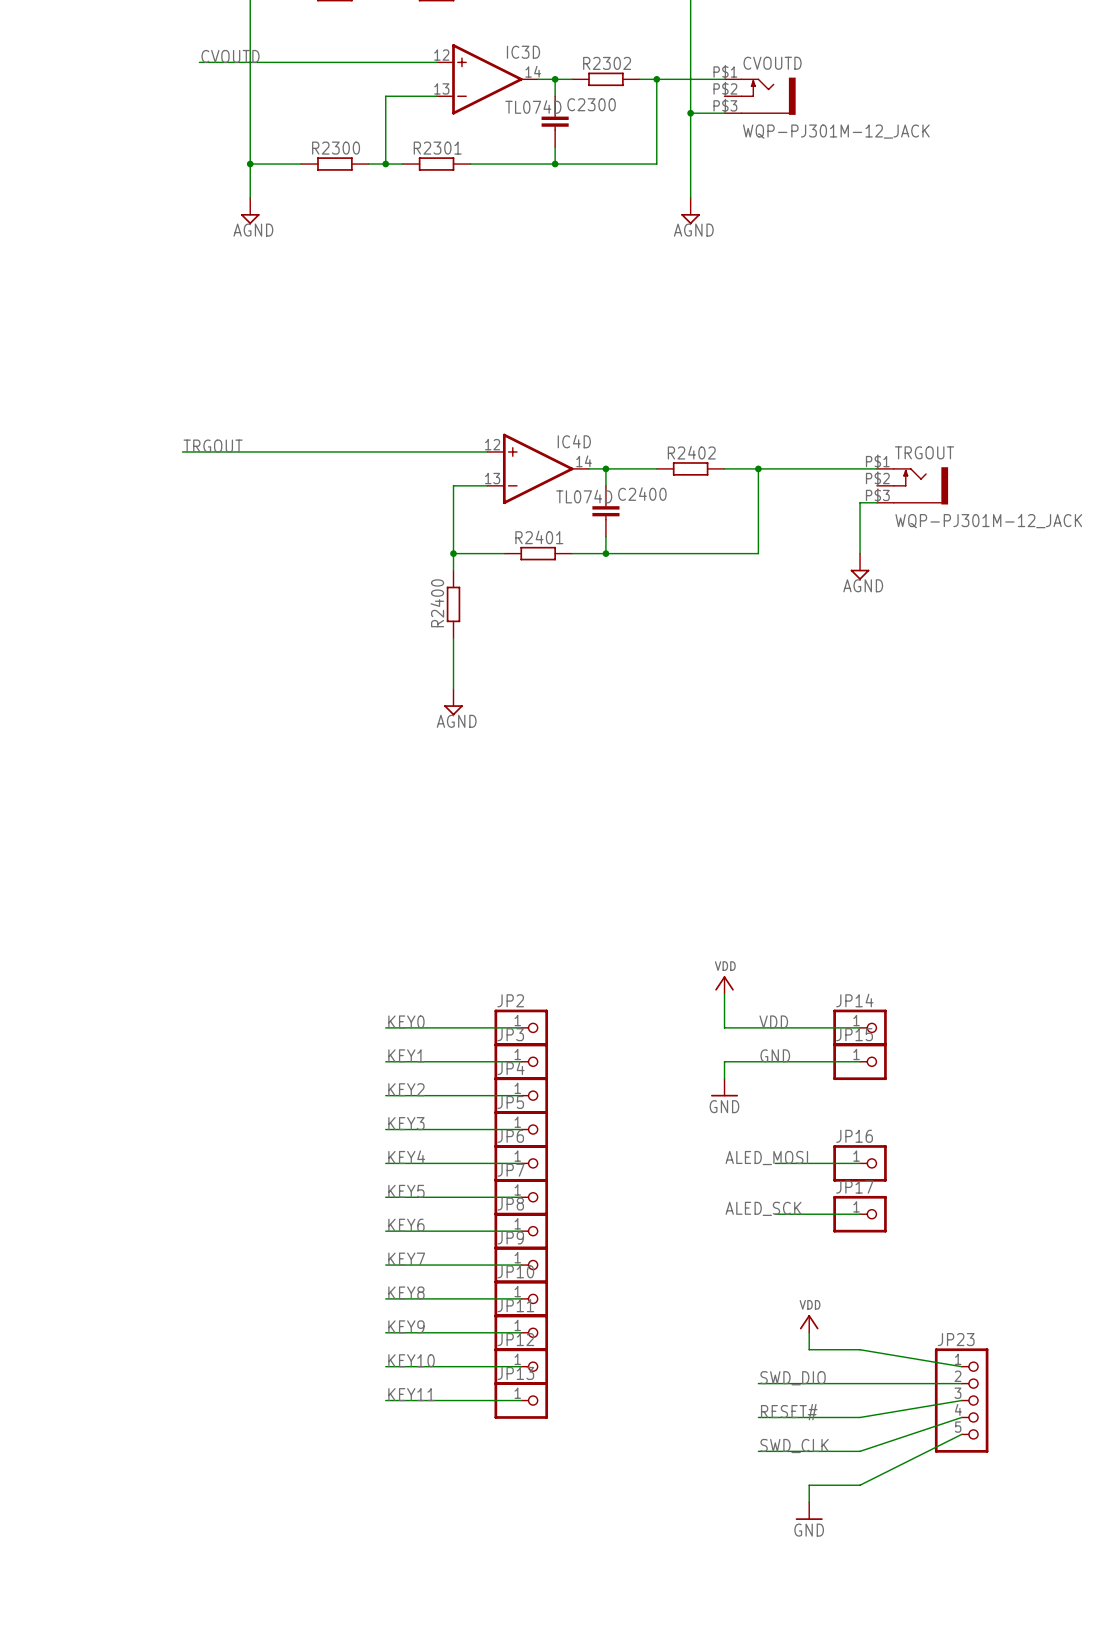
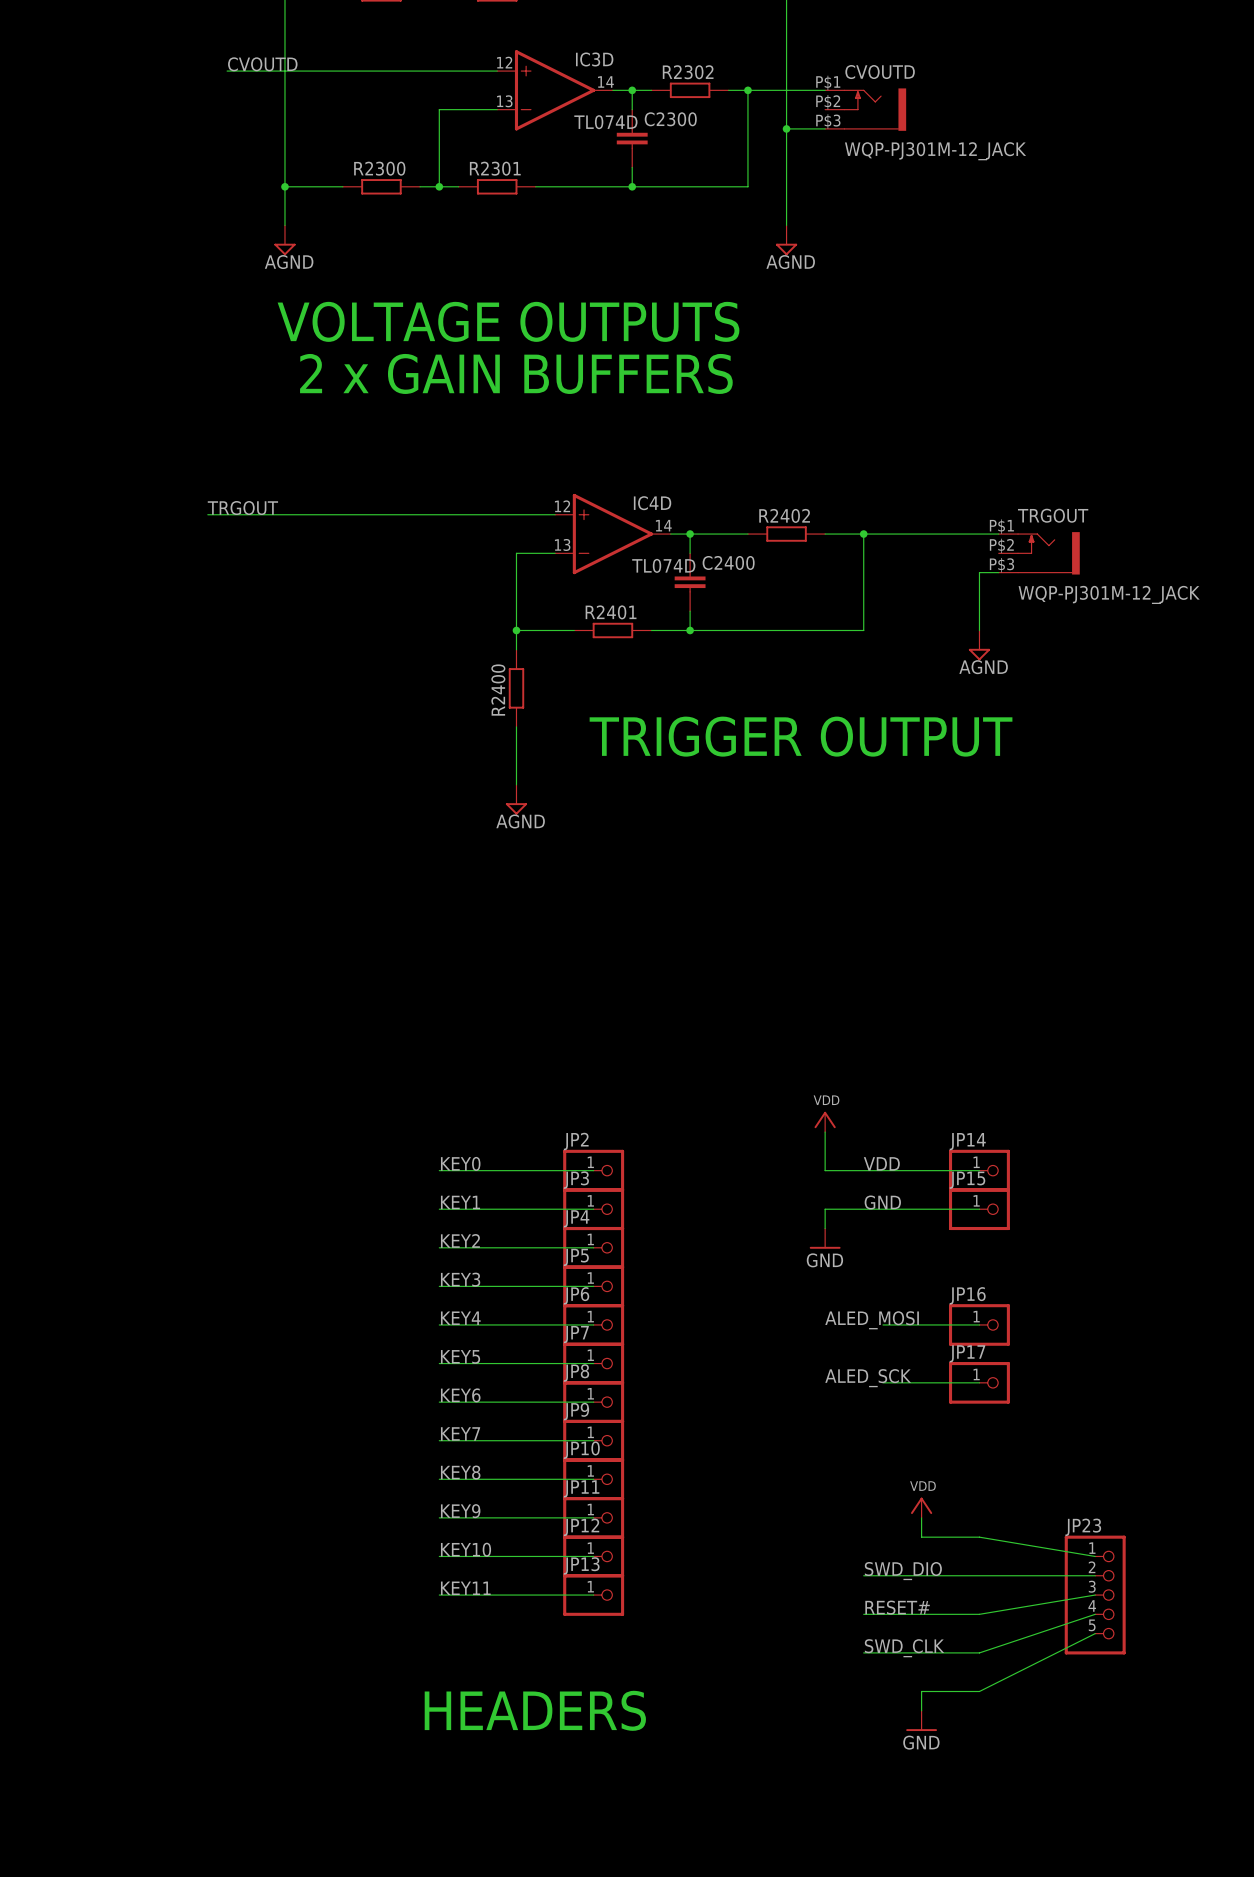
text: none -> VOLTAGE OUTPUTS (508, 321)
text: none -> 2 x GAIN BUFFERS (516, 373)
text: none -> TRIGGER OUTPUT (801, 736)
text: none -> HEADERS (535, 1710)

